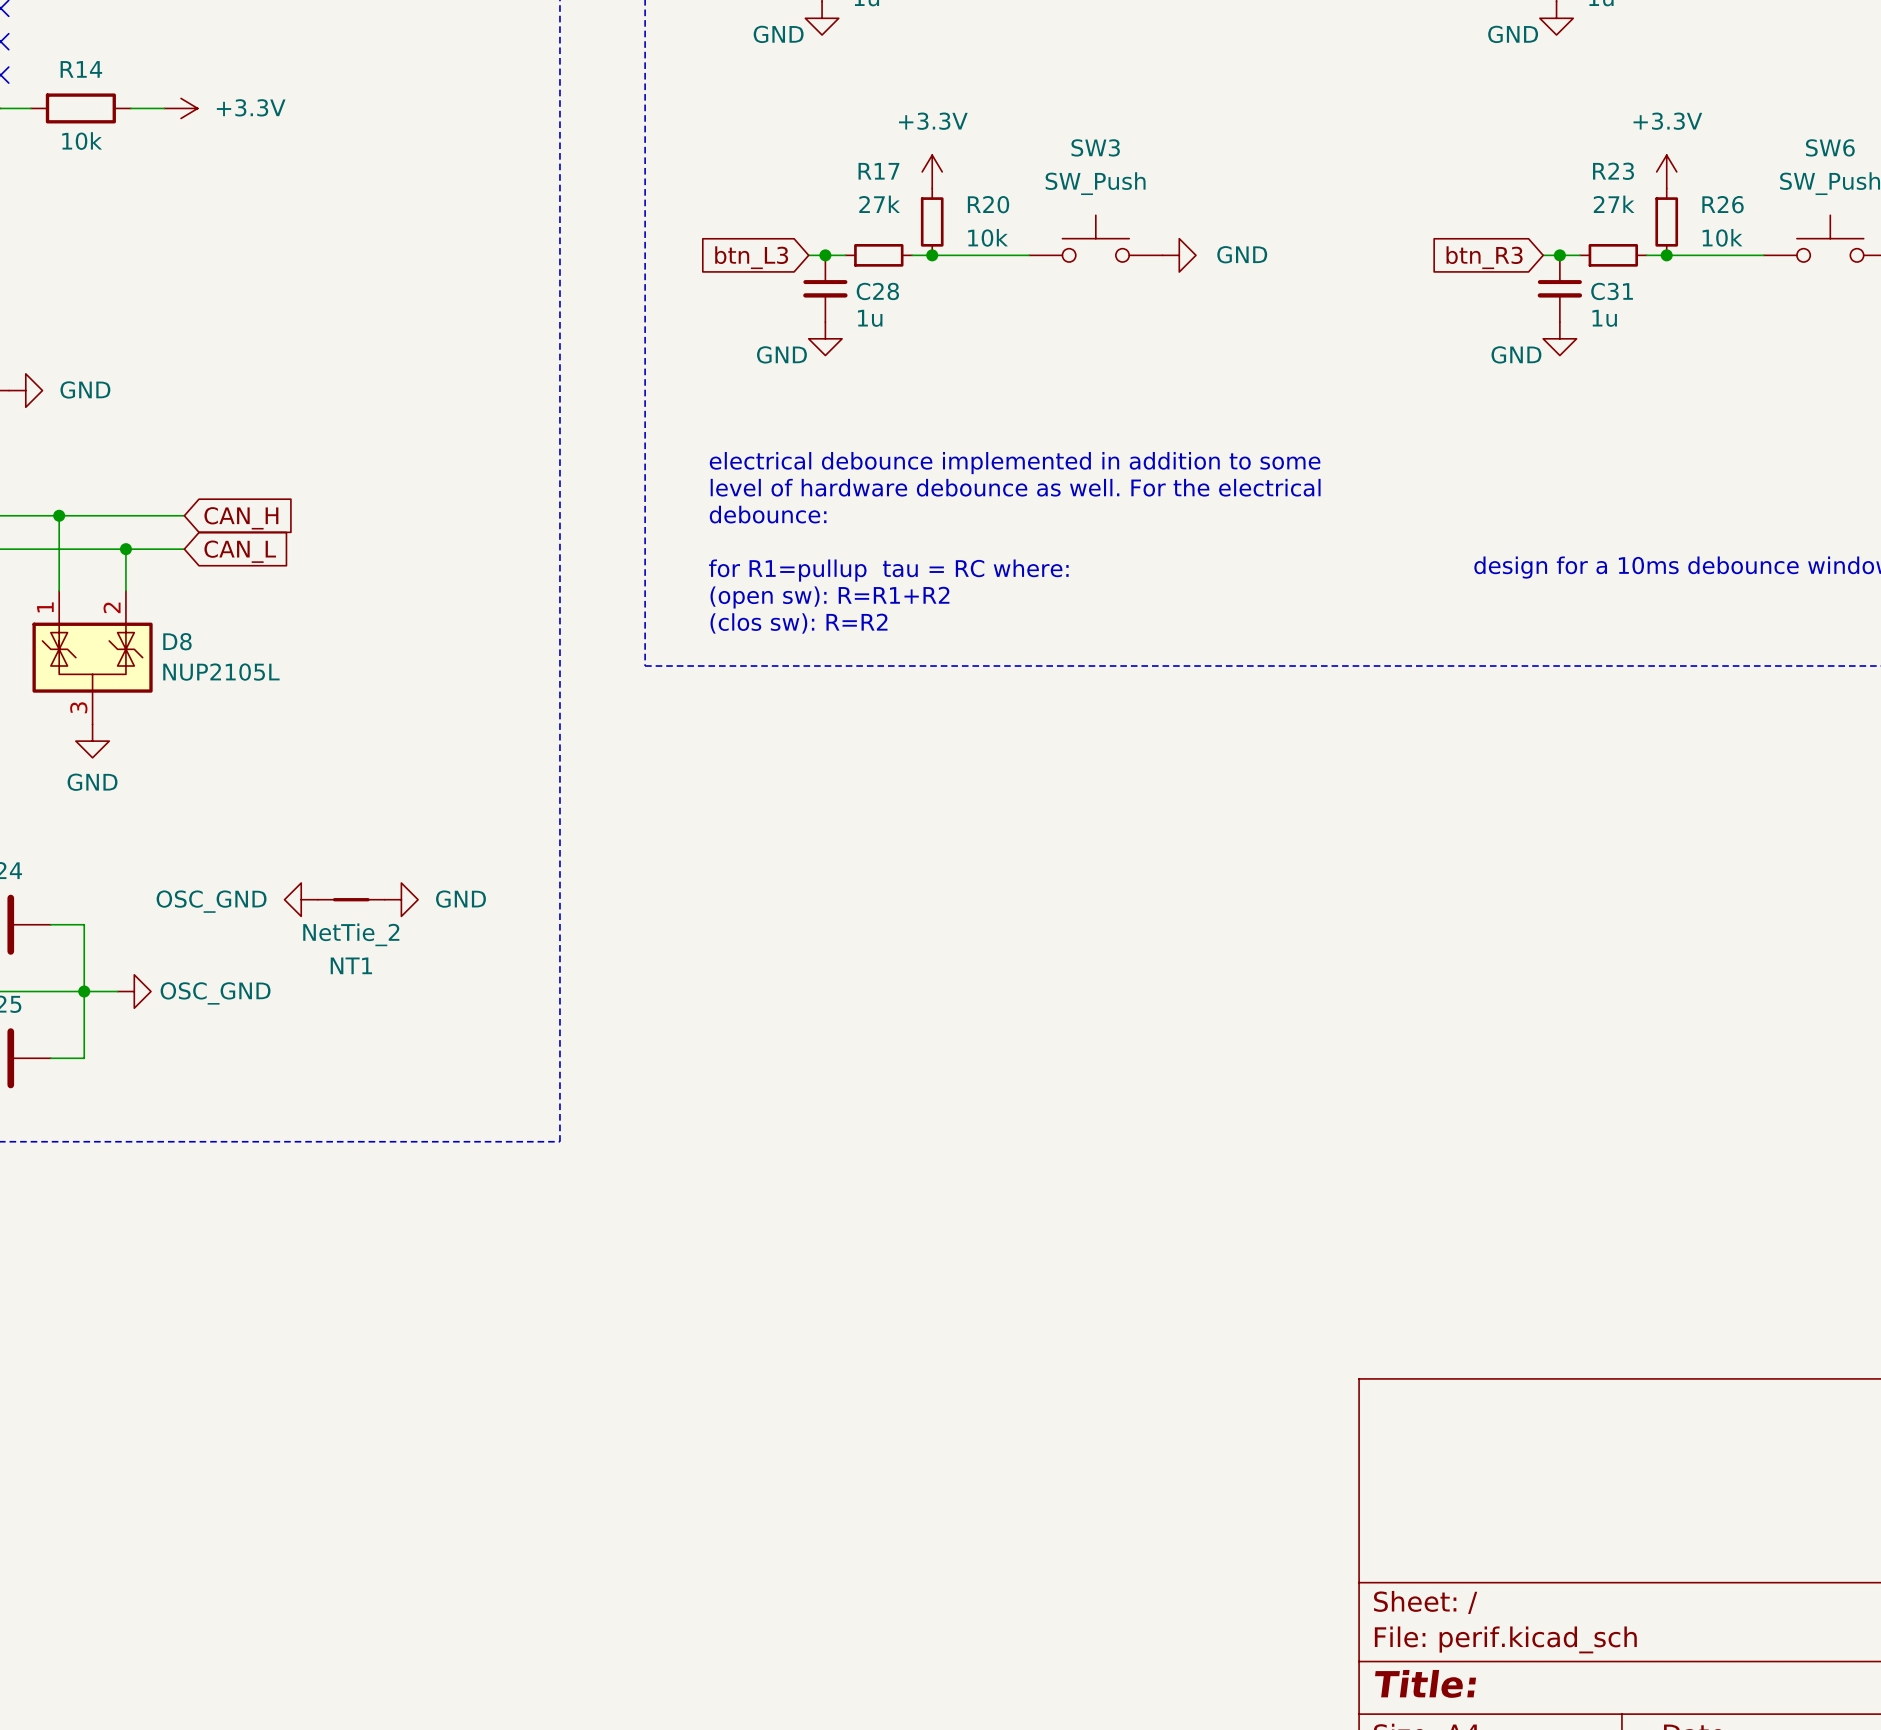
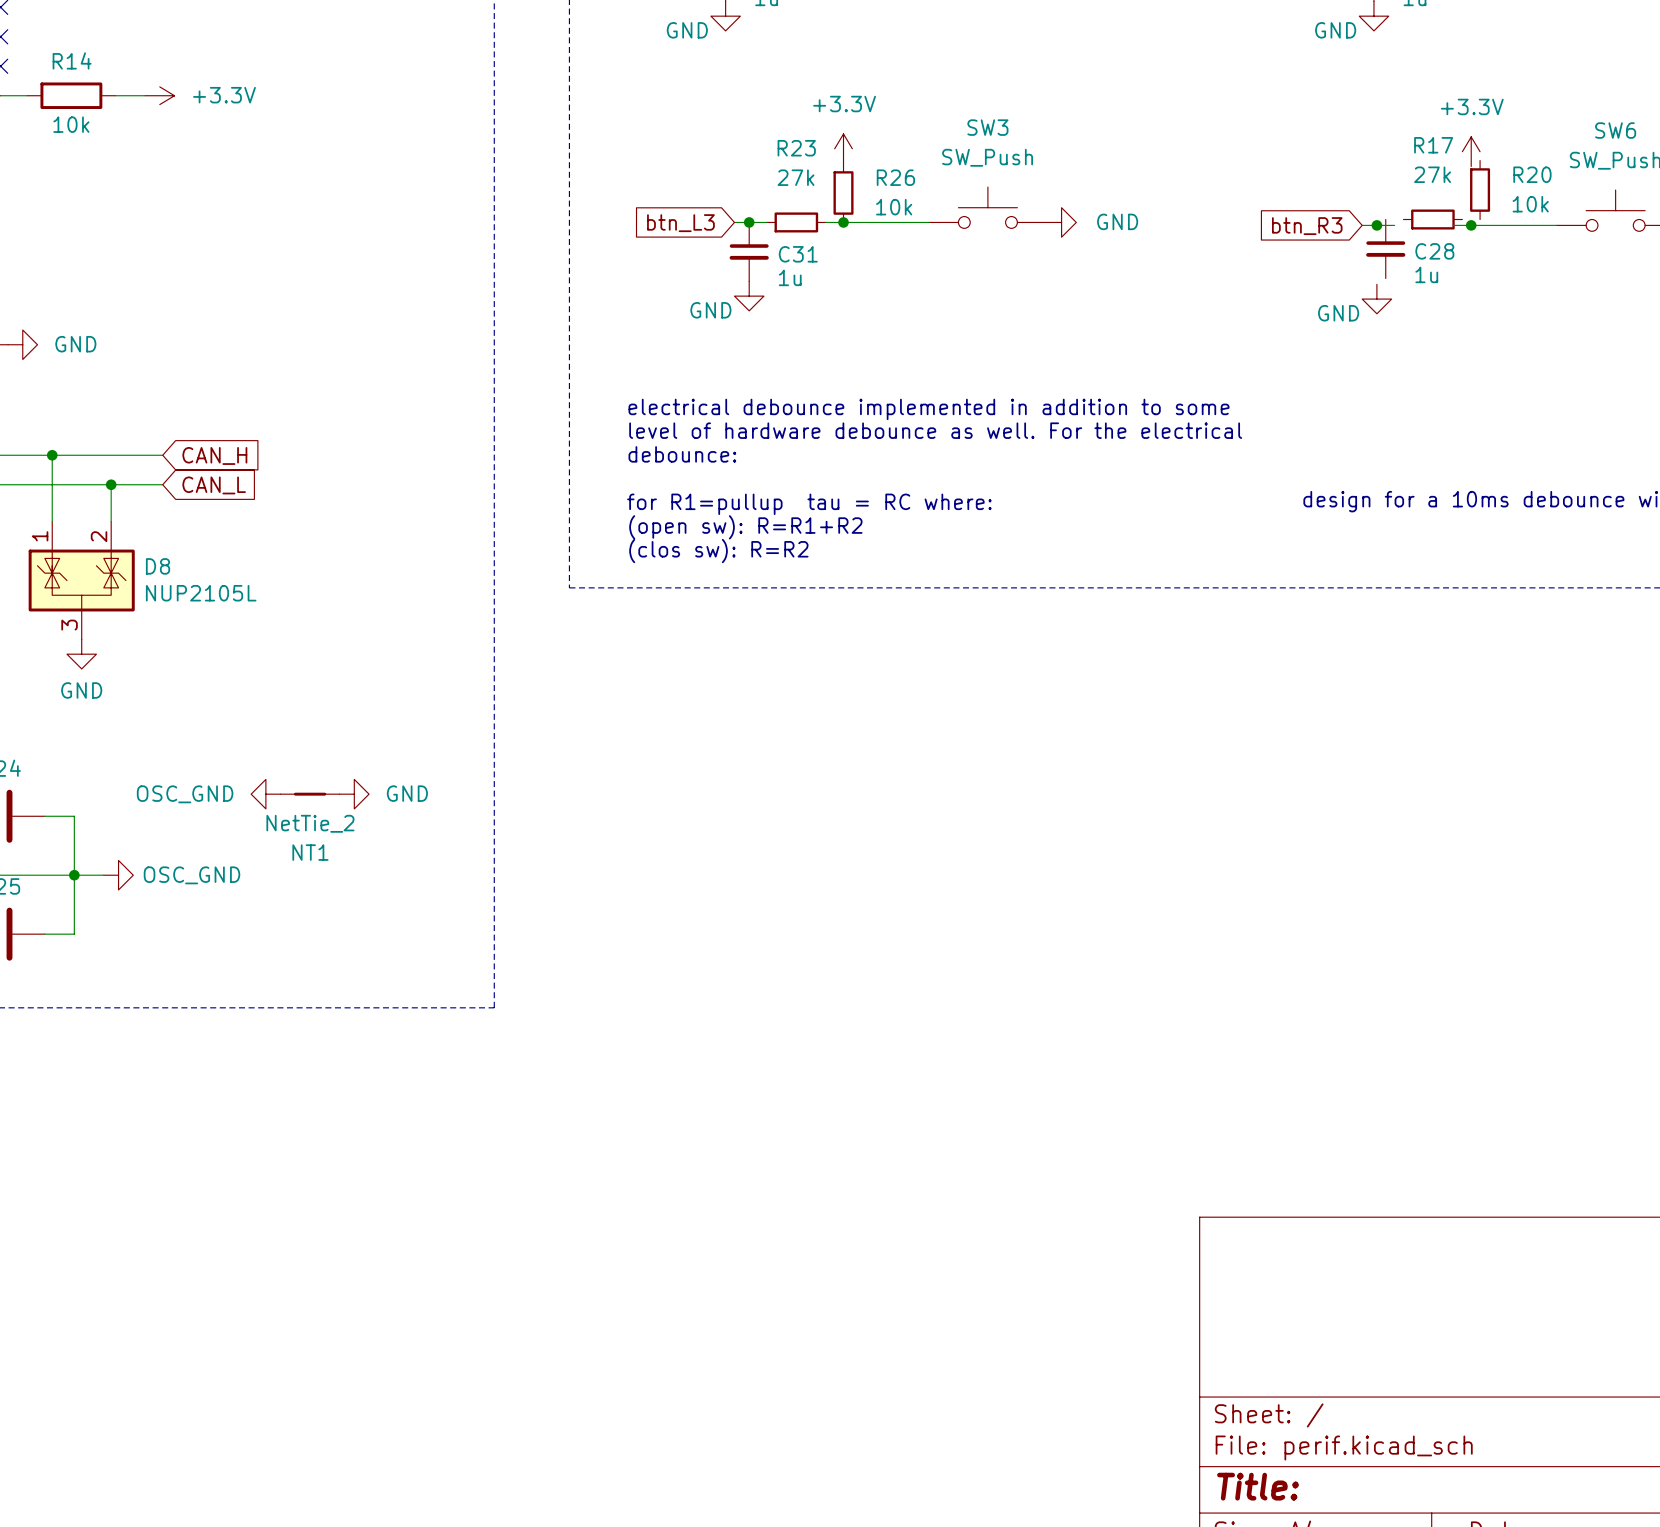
power symbol position: +3.3V (932, 171) -> +3.3V (843, 148)
R20 position: (932, 221) -> (1480, 190)
R26 position: (1666, 221) -> (843, 192)
SW3 position: (1095, 238) -> (987, 207)
wire: (808, 255) (845, 255) -> (734, 222) (766, 222)
junction position: (825, 255) -> (749, 222)
R17 position: (878, 255) -> (1432, 219)
wire: (912, 255) (1029, 255) -> (825, 222) (928, 222)
junction position: (932, 255) -> (843, 222)
power symbol position: GND (1179, 255) -> GND (1061, 222)
R23 position: (1613, 255) -> (796, 222)
global label position: btn_L3 (751, 257) -> btn_L3 (680, 223)
C28 position: (825, 288) -> (1385, 248)
C31 position: (1559, 288) -> (749, 251)
power symbol position: GND (825, 338) -> GND (749, 296)

